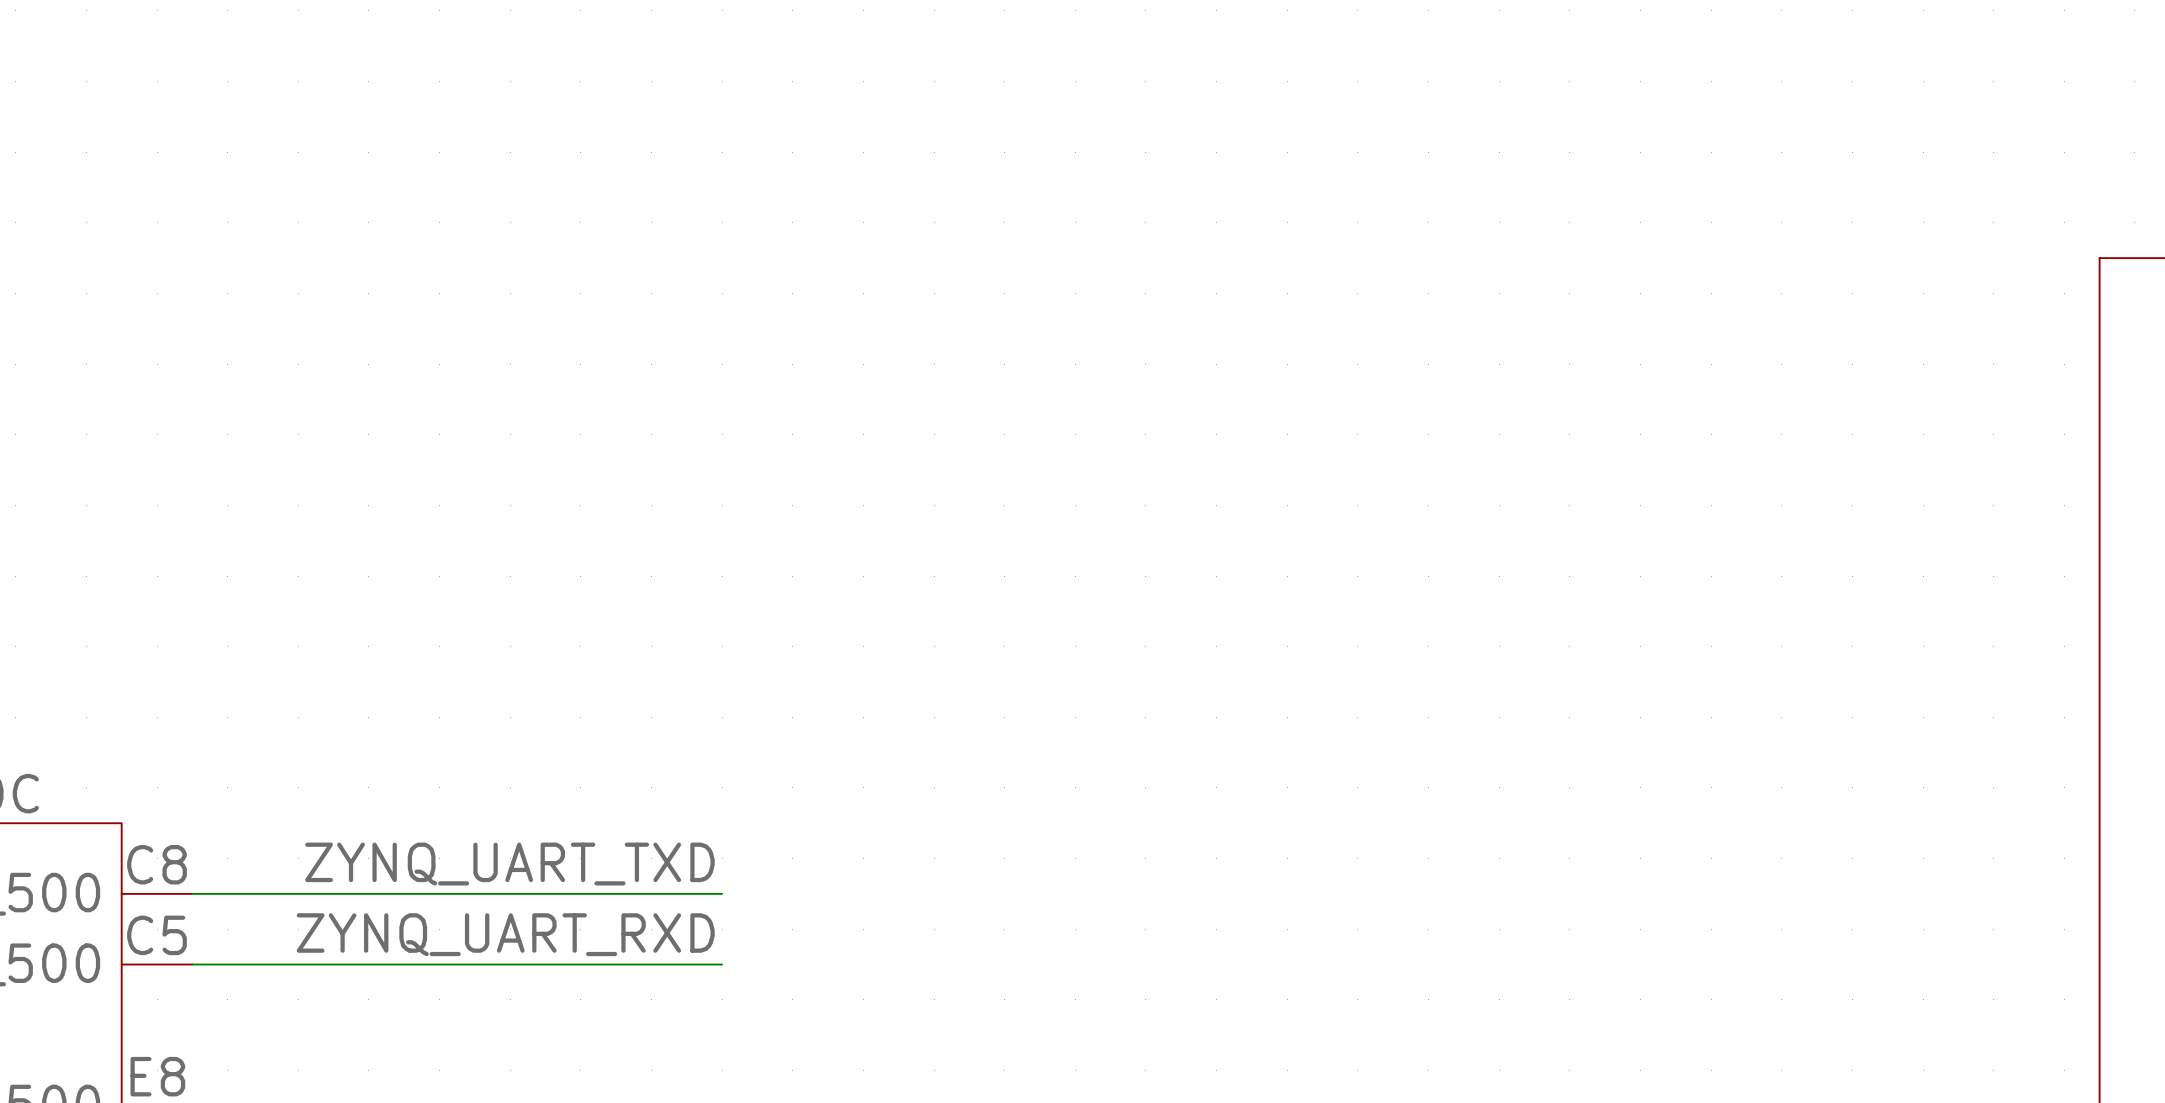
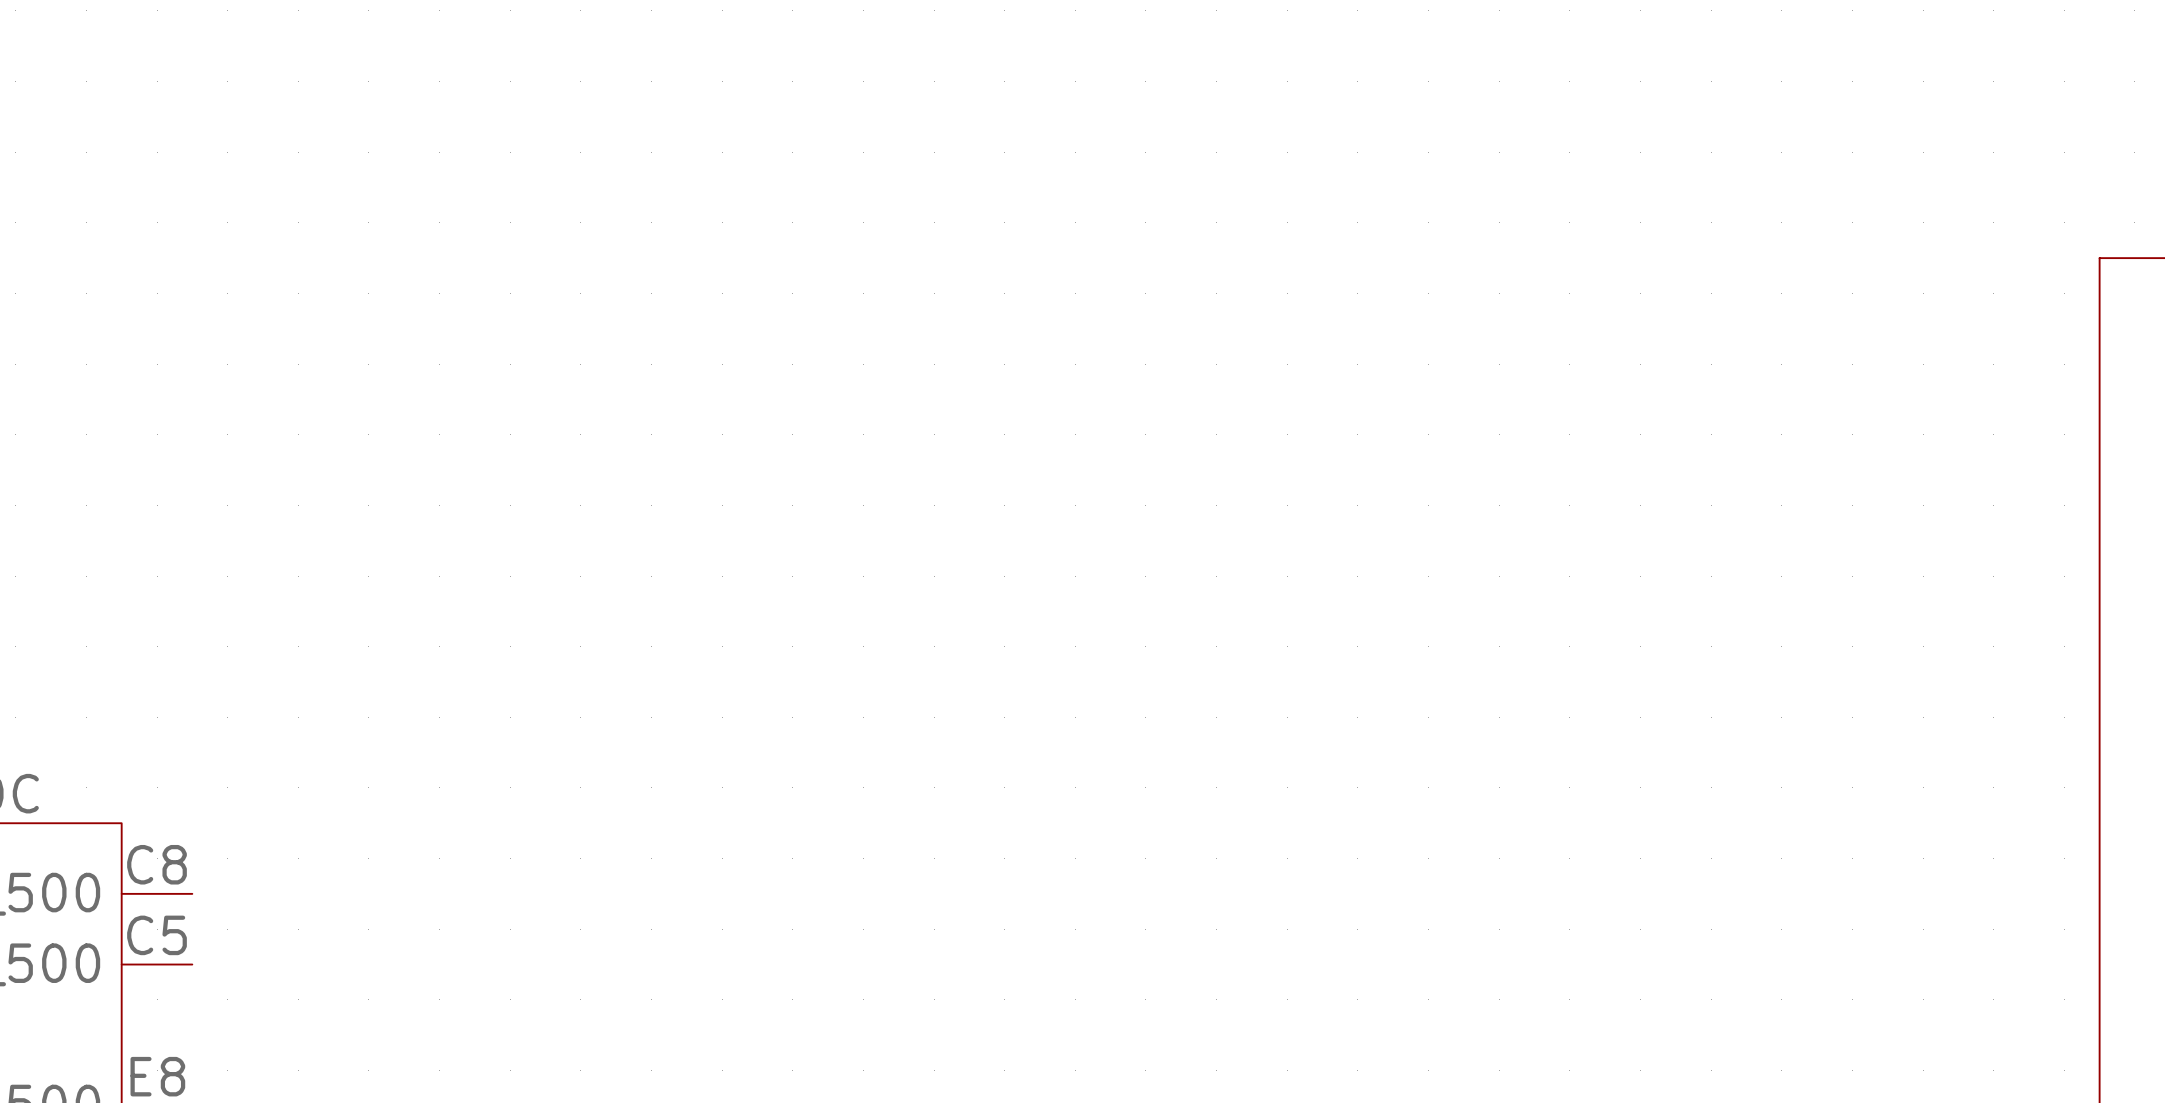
label: ZYNQ_UART_TXD (509, 864) -> none
wire: (192, 893) (722, 893) -> none
label: ZYNQ_UART_RXD (505, 934) -> none
wire: (192, 964) (722, 964) -> none

